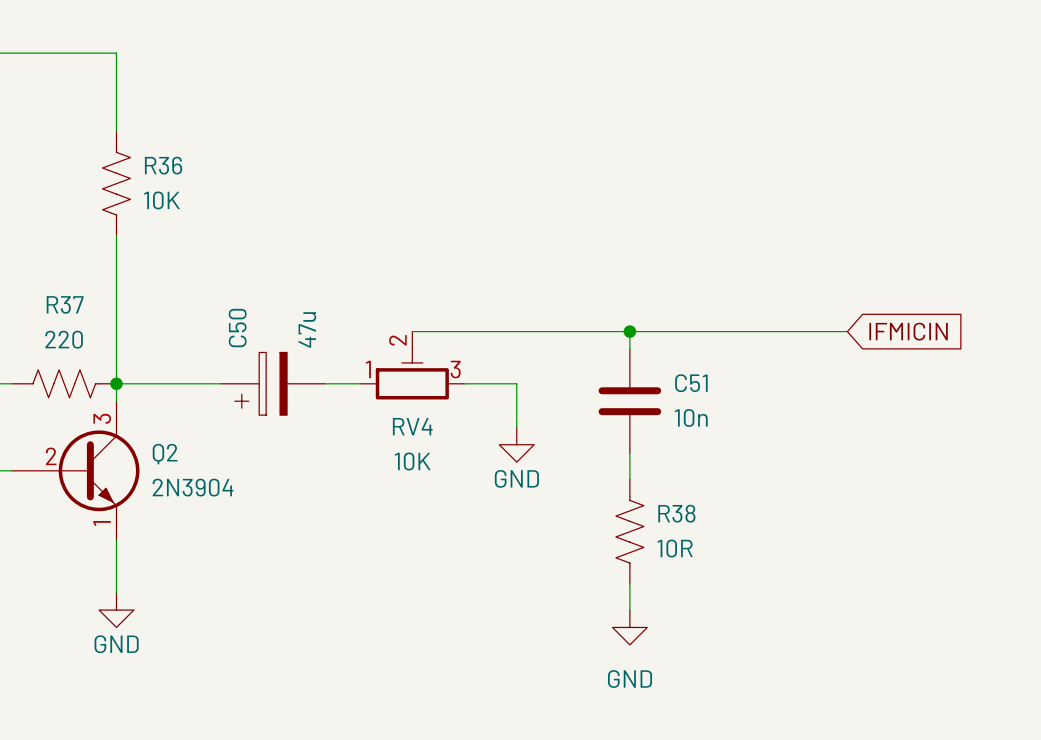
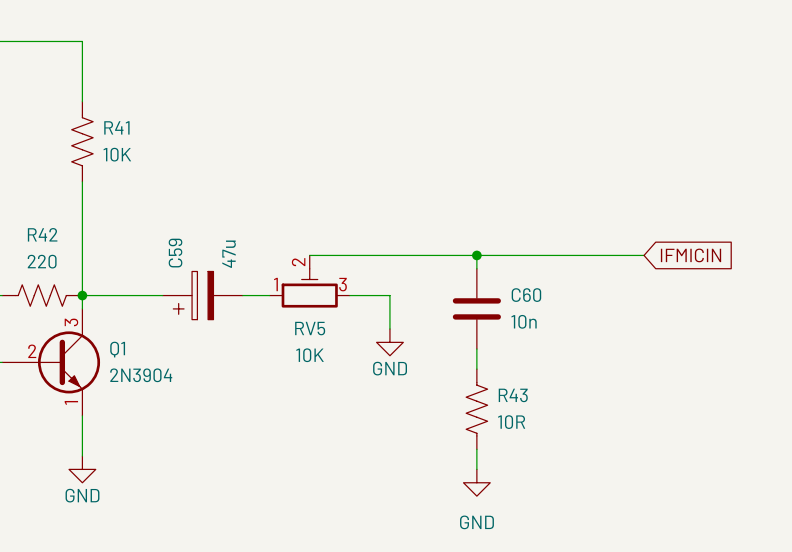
R36 name: R36 (163, 165) -> R41 (116, 127)
R37 name: R37 (65, 304) -> R42 (42, 234)
C50 name: C50 (237, 328) -> C59 (175, 253)
C51 name: C51 (691, 383) -> C60 (526, 295)
RV4 name: RV4 (412, 426) -> RV5 (310, 328)
Q2 name: Q2 (165, 454) -> Q1 (117, 349)
R38 name: R38 (676, 513) -> R43 (513, 395)

